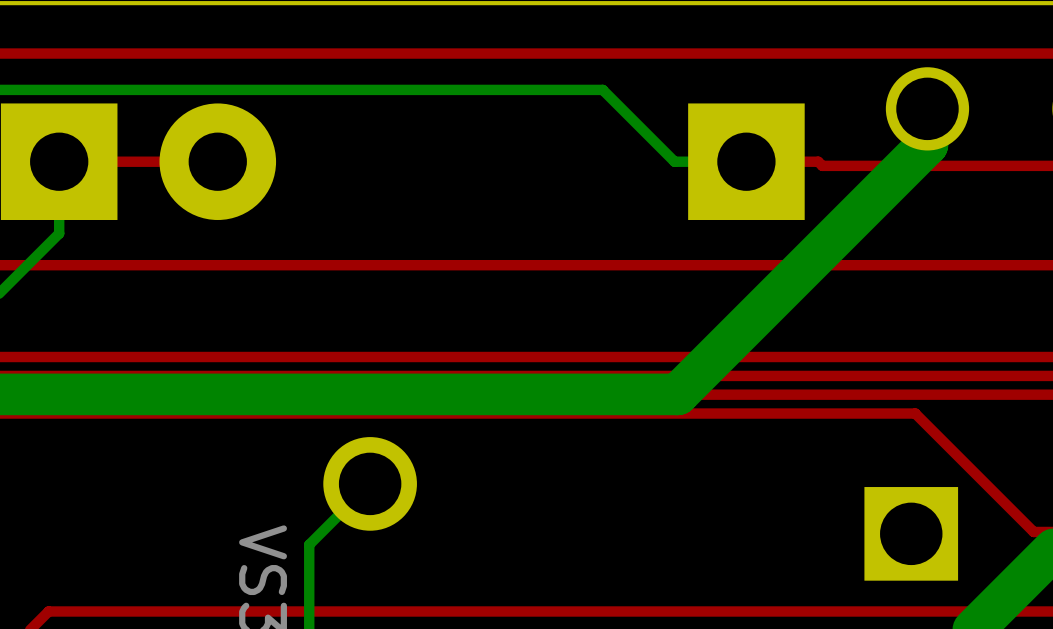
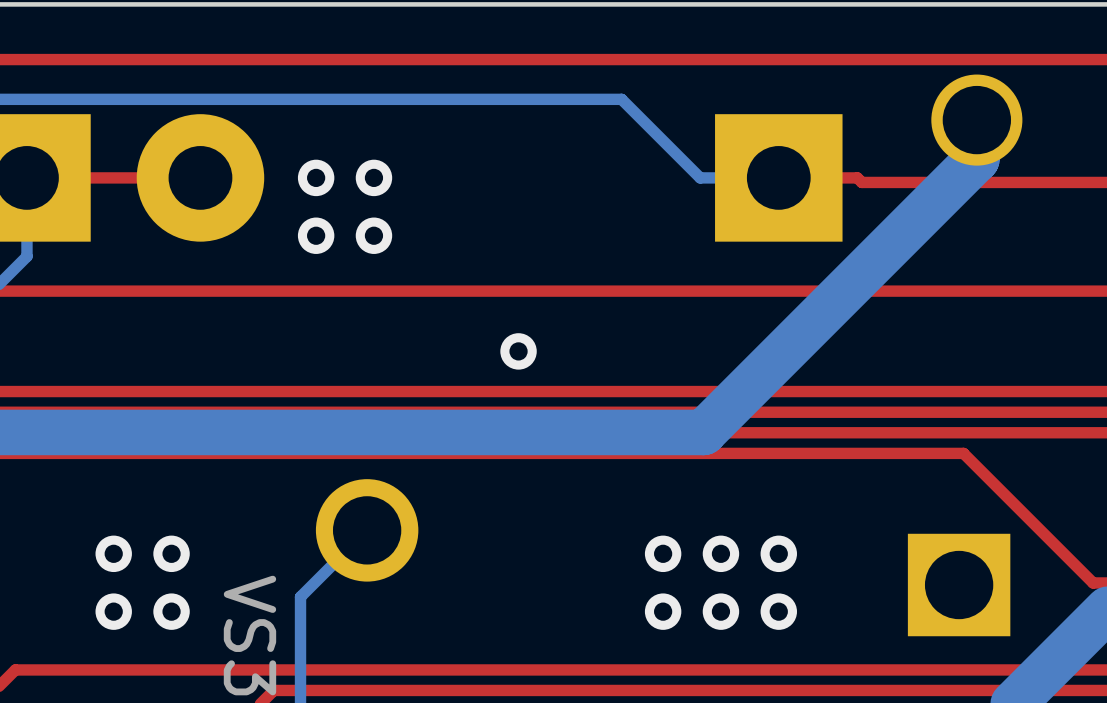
via: none -> (316, 177)
via: none -> (373, 177)
via: none -> (316, 235)
via: none -> (373, 235)
via: none -> (518, 351)
via: none -> (113, 553)
via: none -> (171, 553)
via: none -> (663, 553)
via: none -> (720, 553)
via: none -> (778, 553)
via: none -> (113, 611)
via: none -> (171, 611)
via: none -> (663, 611)
via: none -> (720, 611)
via: none -> (778, 611)

